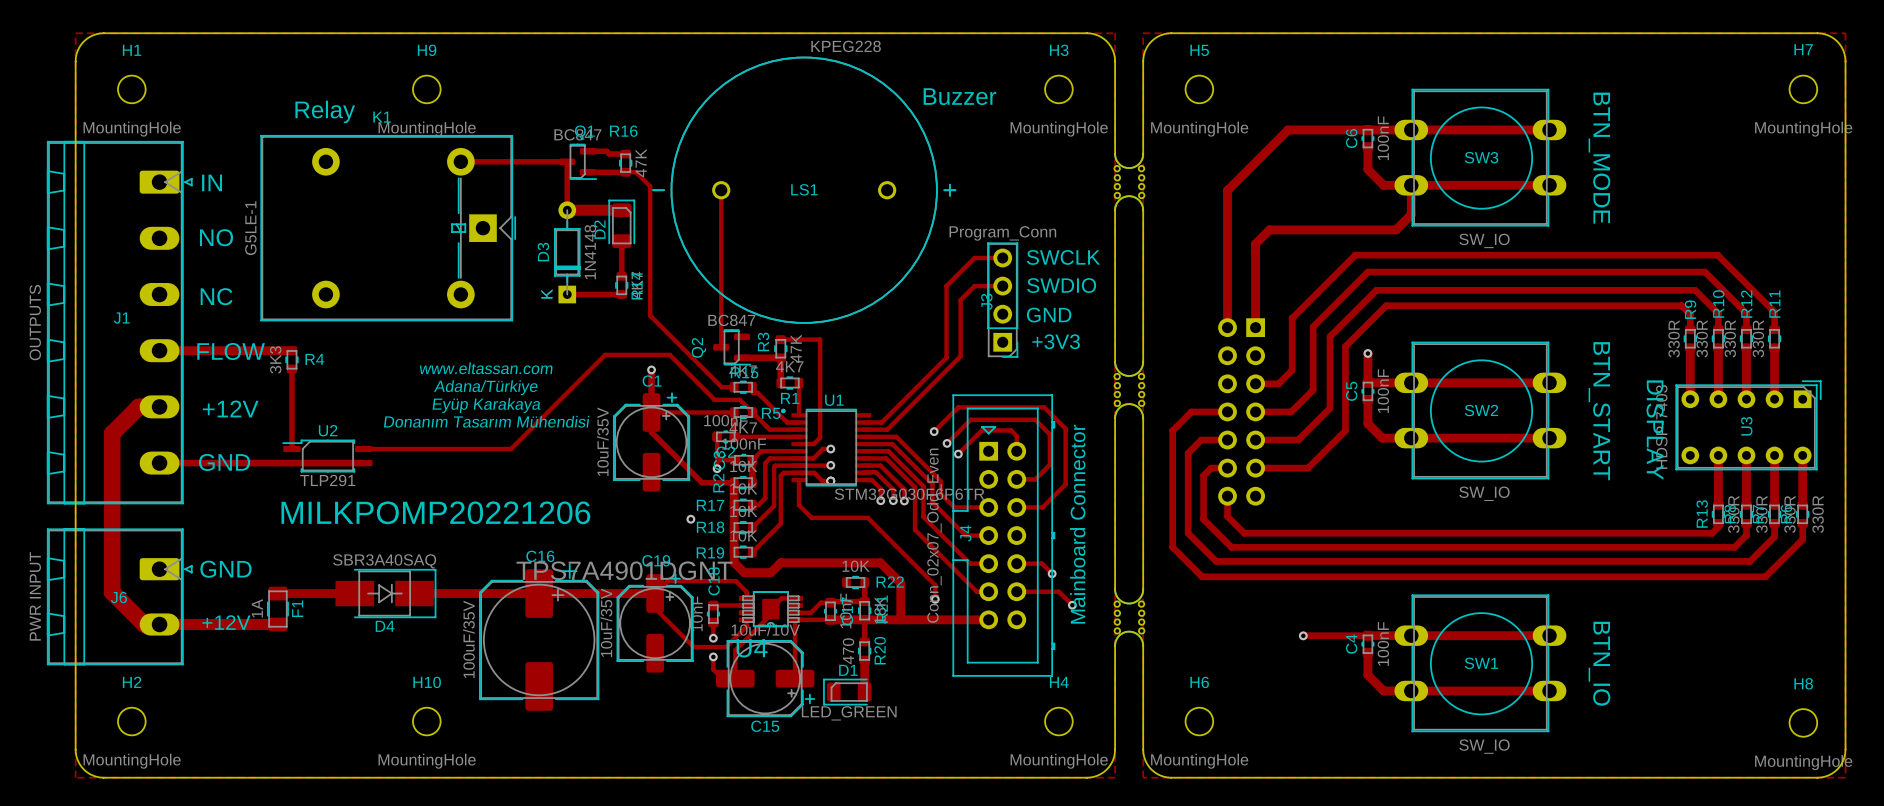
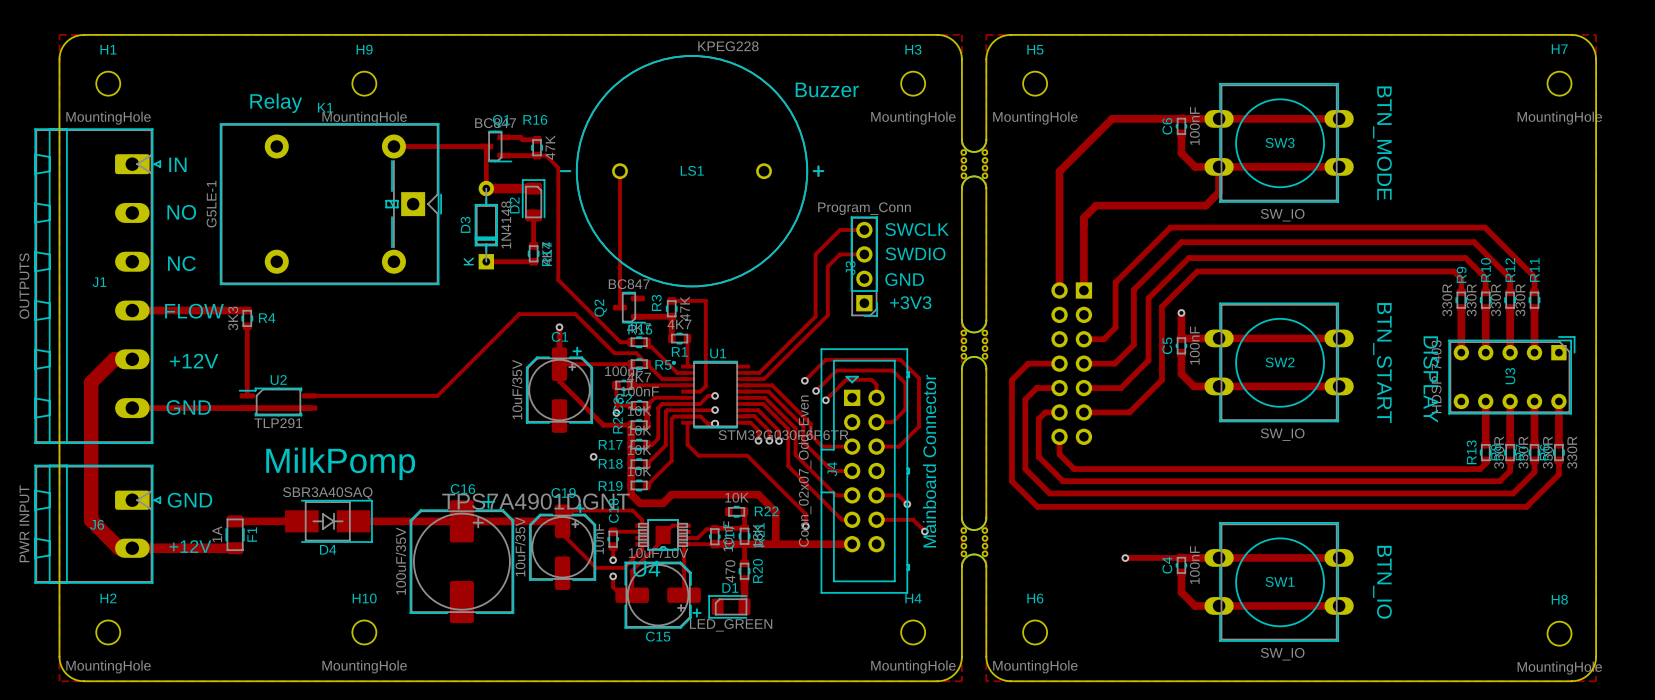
text: www.eltassan.com (486, 368) -> none
text: Adana/Türkiye (486, 387) -> none
text: Eyüp Karakaya (486, 405) -> none
text: Donanım Tasarım Mühendisi (486, 421) -> none
text: MILKPOMP20221206 (435, 512) -> none
text: none -> MilkPomp (340, 463)

